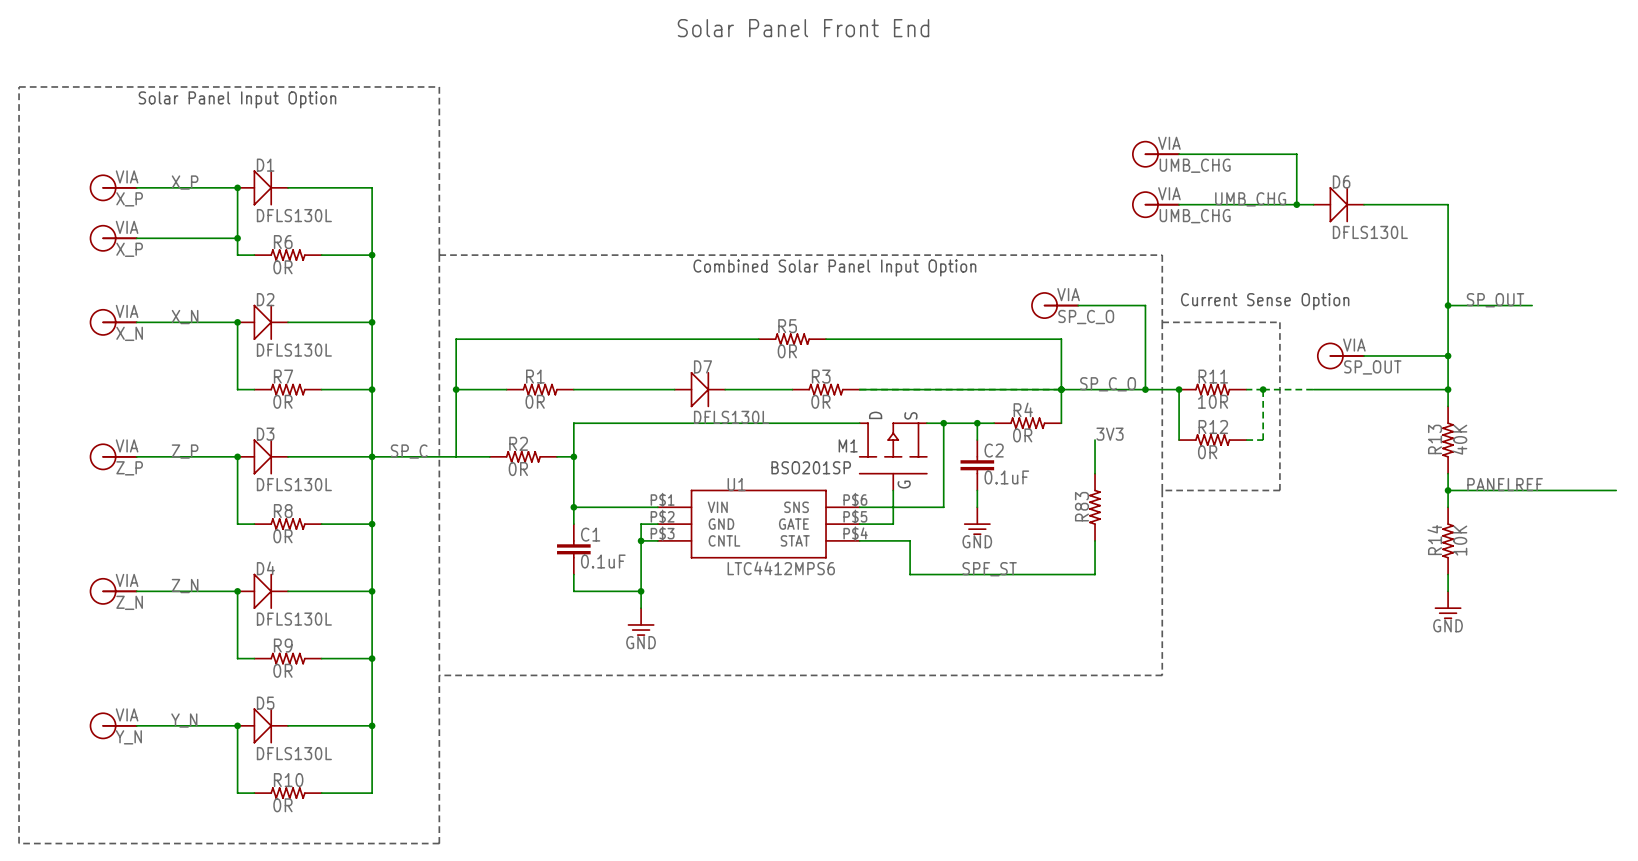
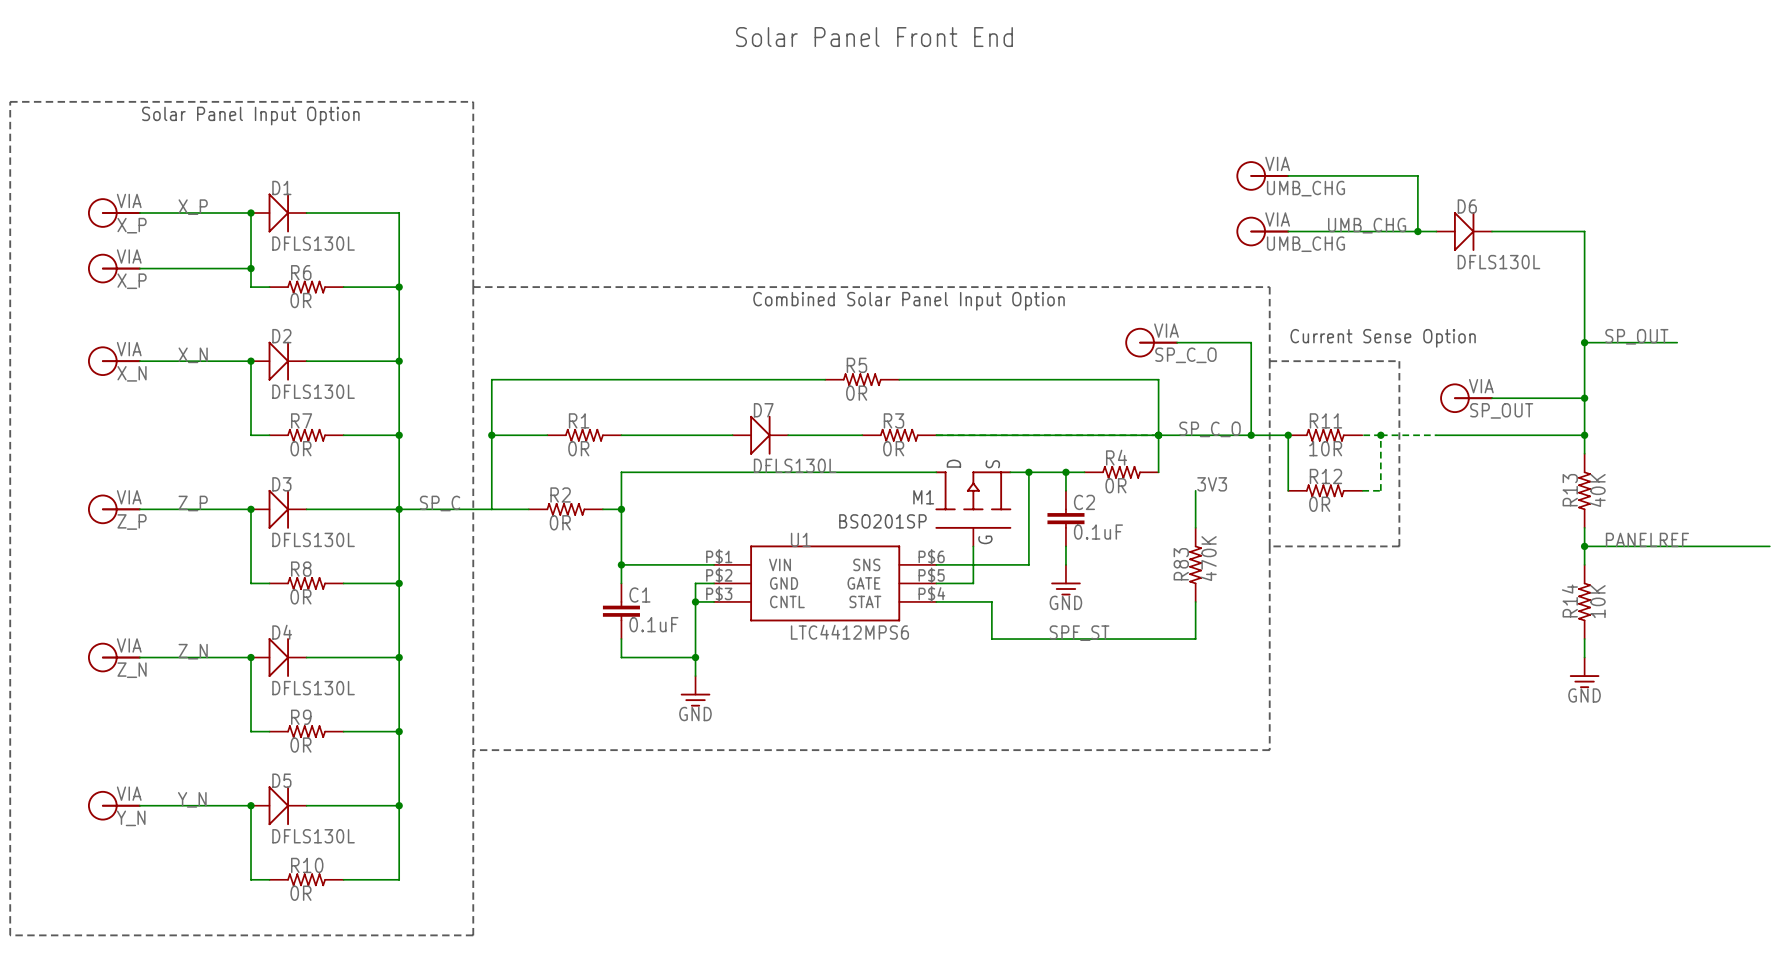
R83 value: none -> 470K (1208, 558)

